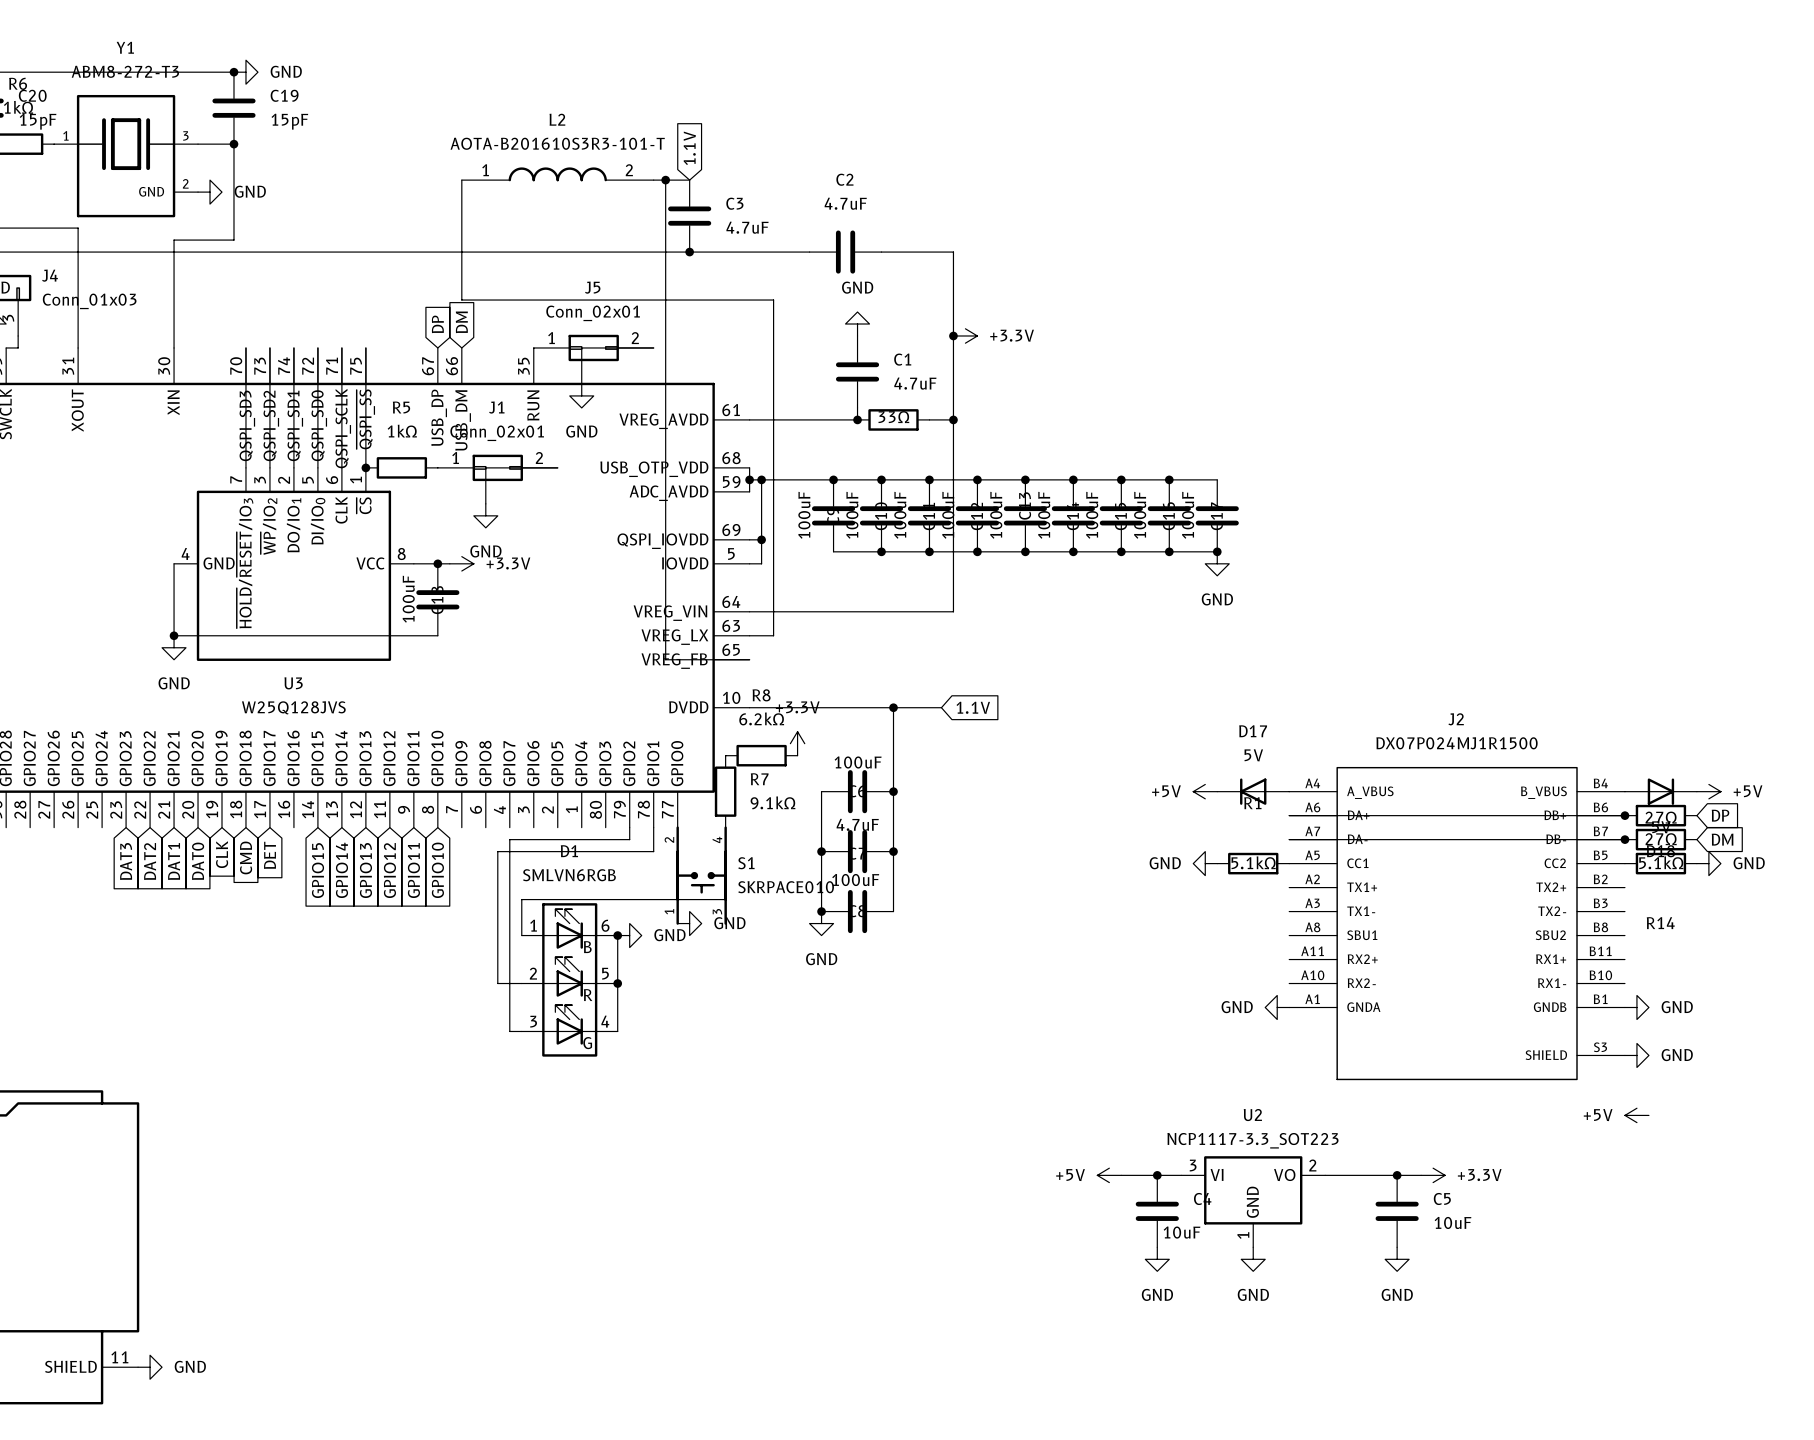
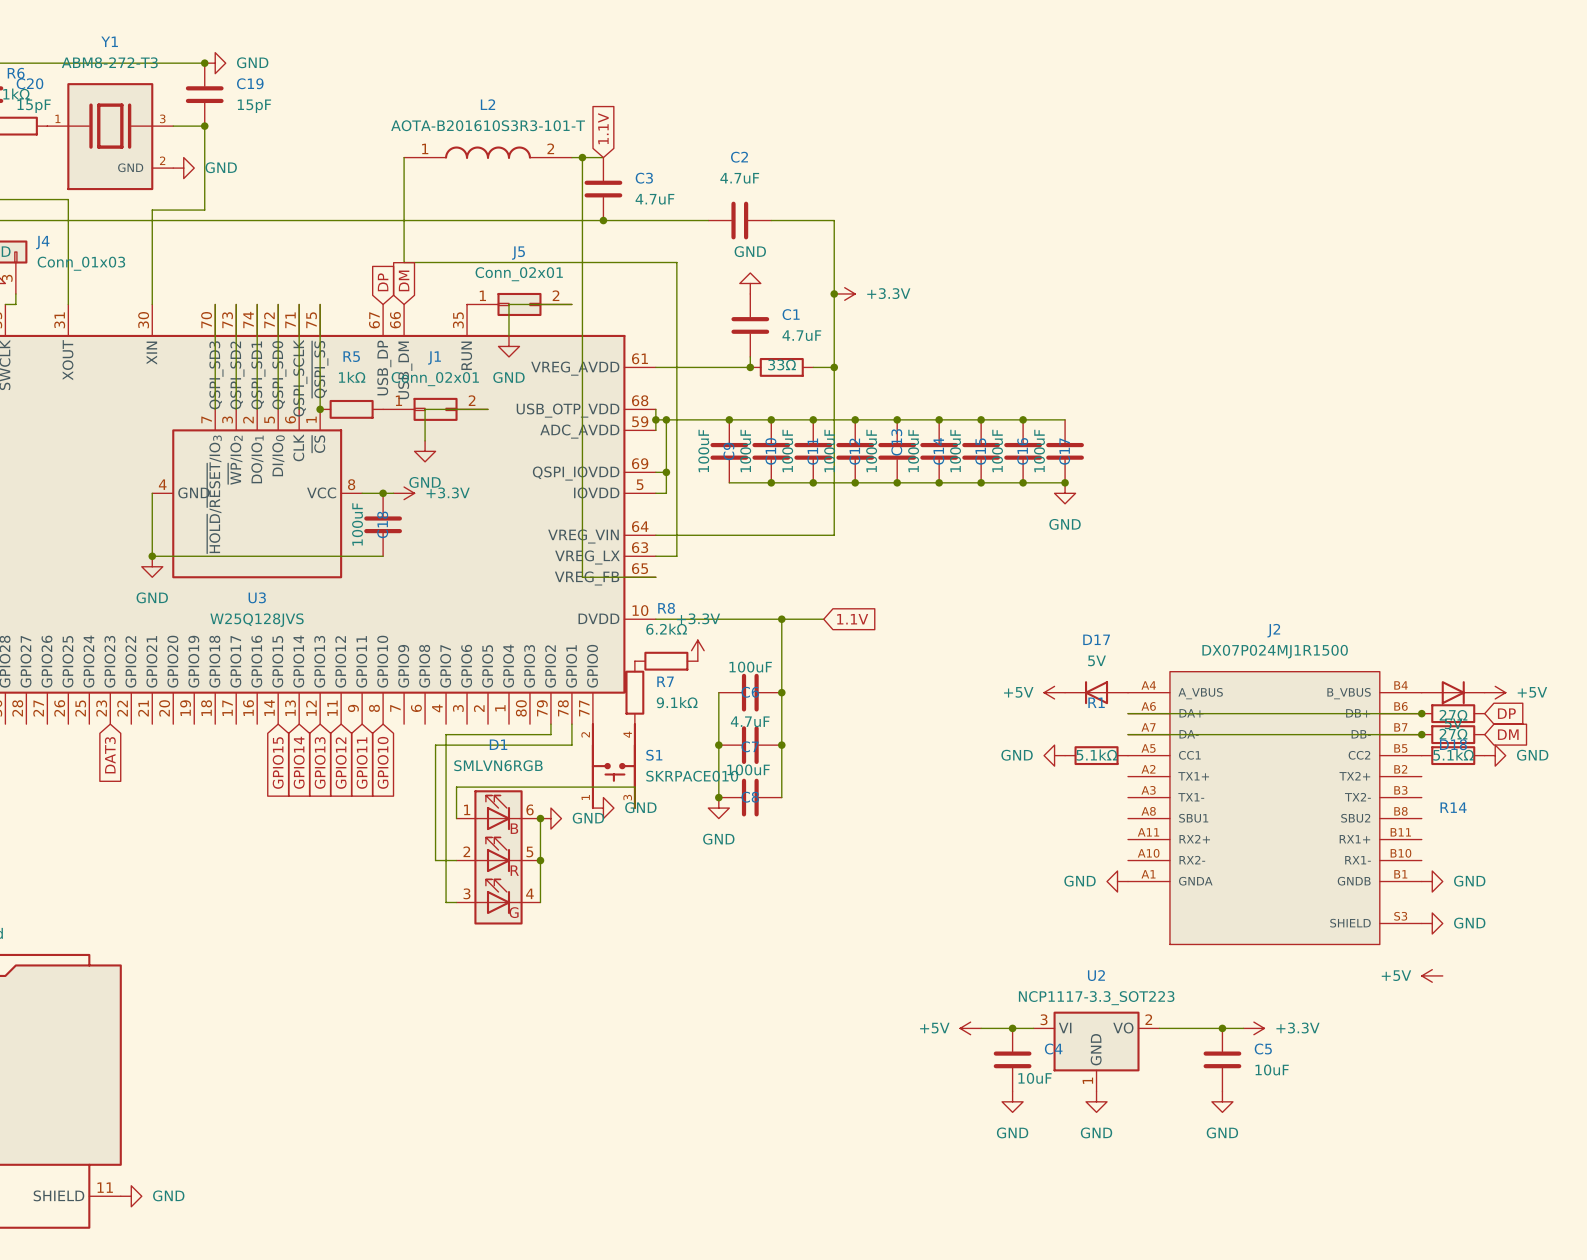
global label: CLK (222, 854) -> none
global label: DET (270, 855) -> none
global label: CMD (246, 857) -> none
global label: DAT2 (150, 861) -> none
global label: DAT1 (174, 861) -> none
global label: DAT0 (198, 861) -> none

